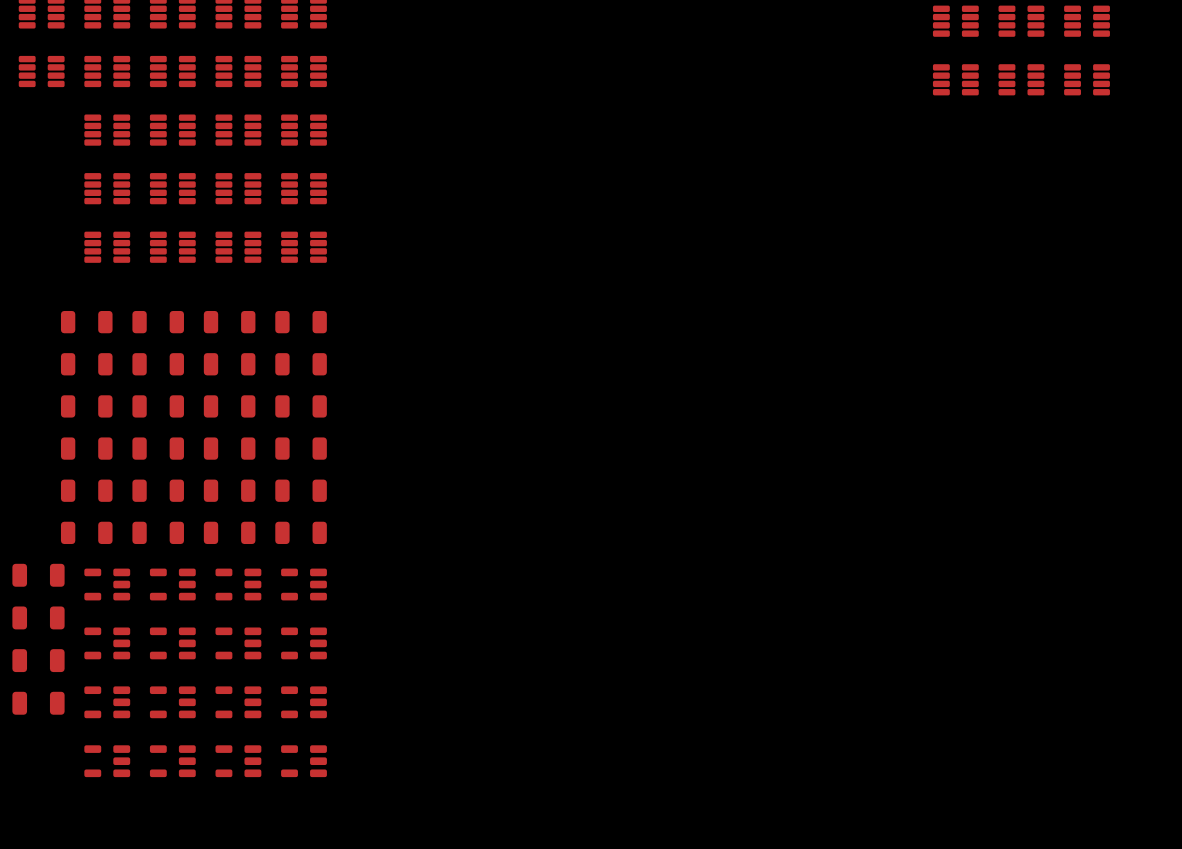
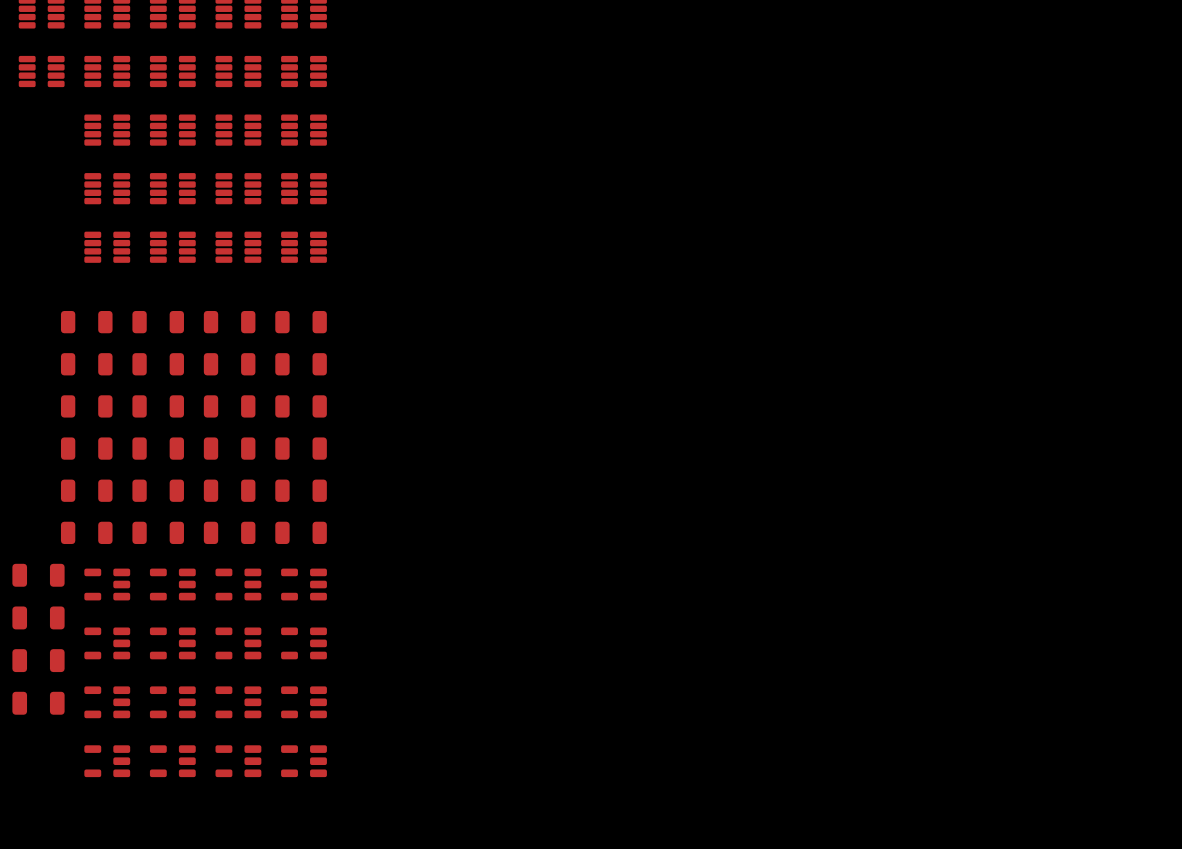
part: (955, 21) -> none
part: (1021, 21) -> none
part: (1087, 21) -> none
part: (955, 79) -> none
part: (1021, 79) -> none
part: (1087, 79) -> none

